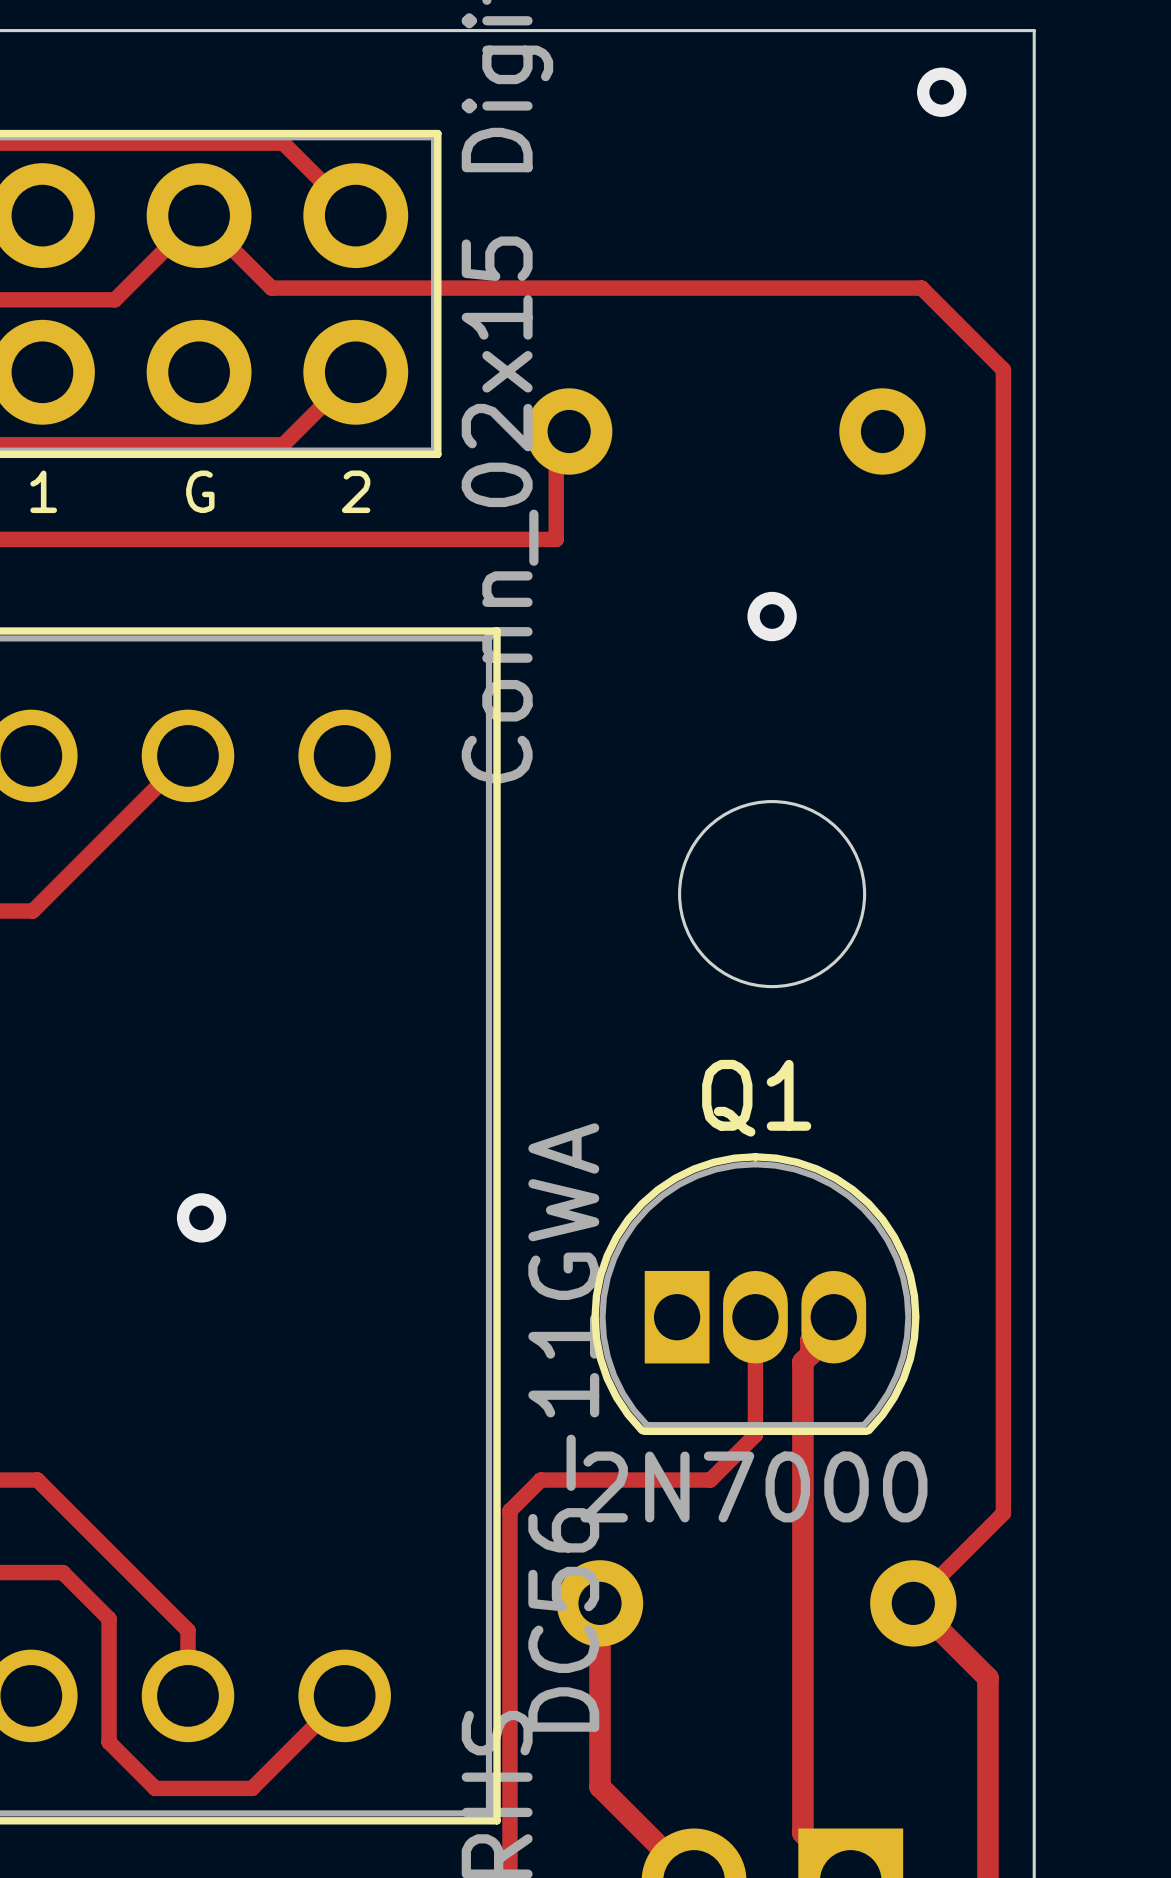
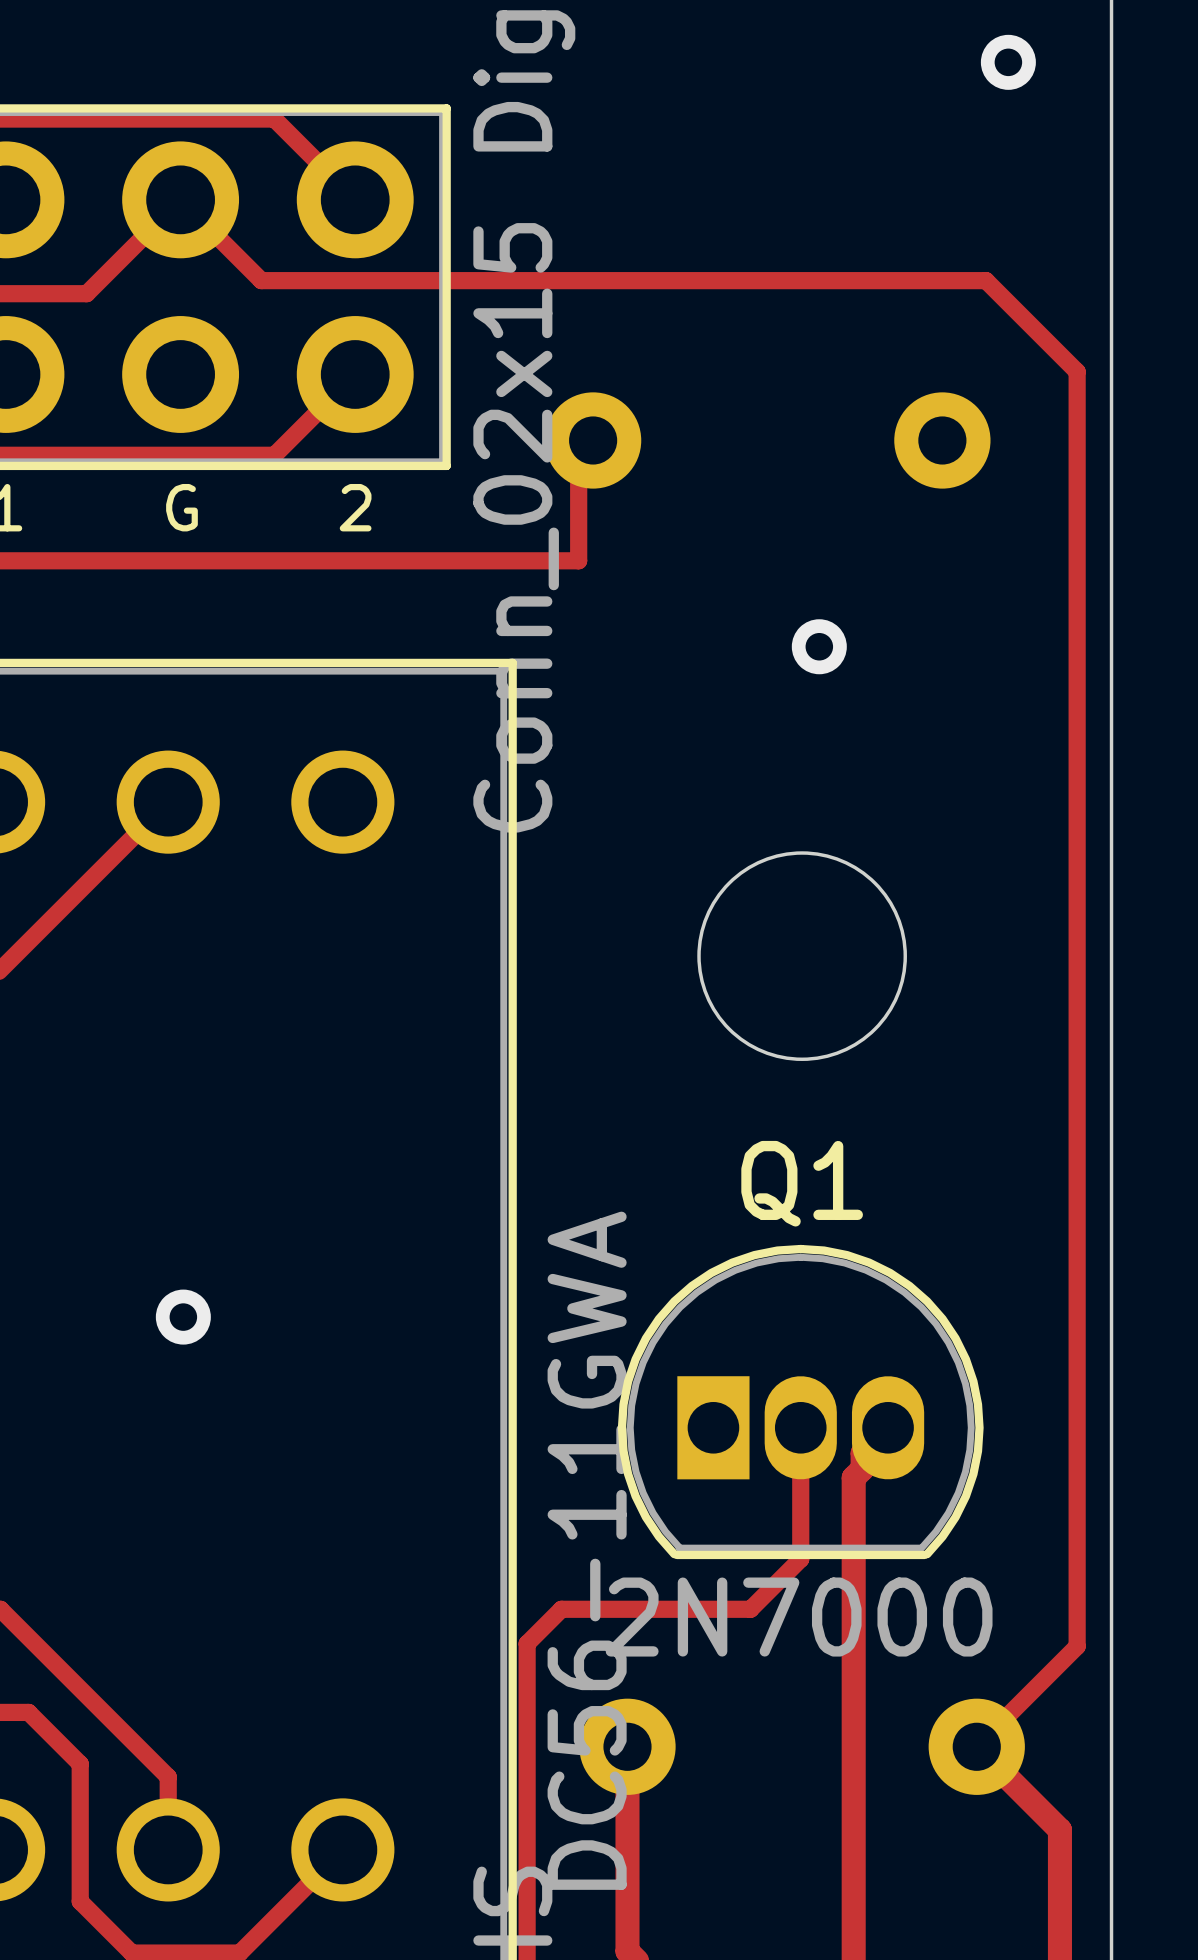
round board edge position: (772, 894) -> (802, 956)

